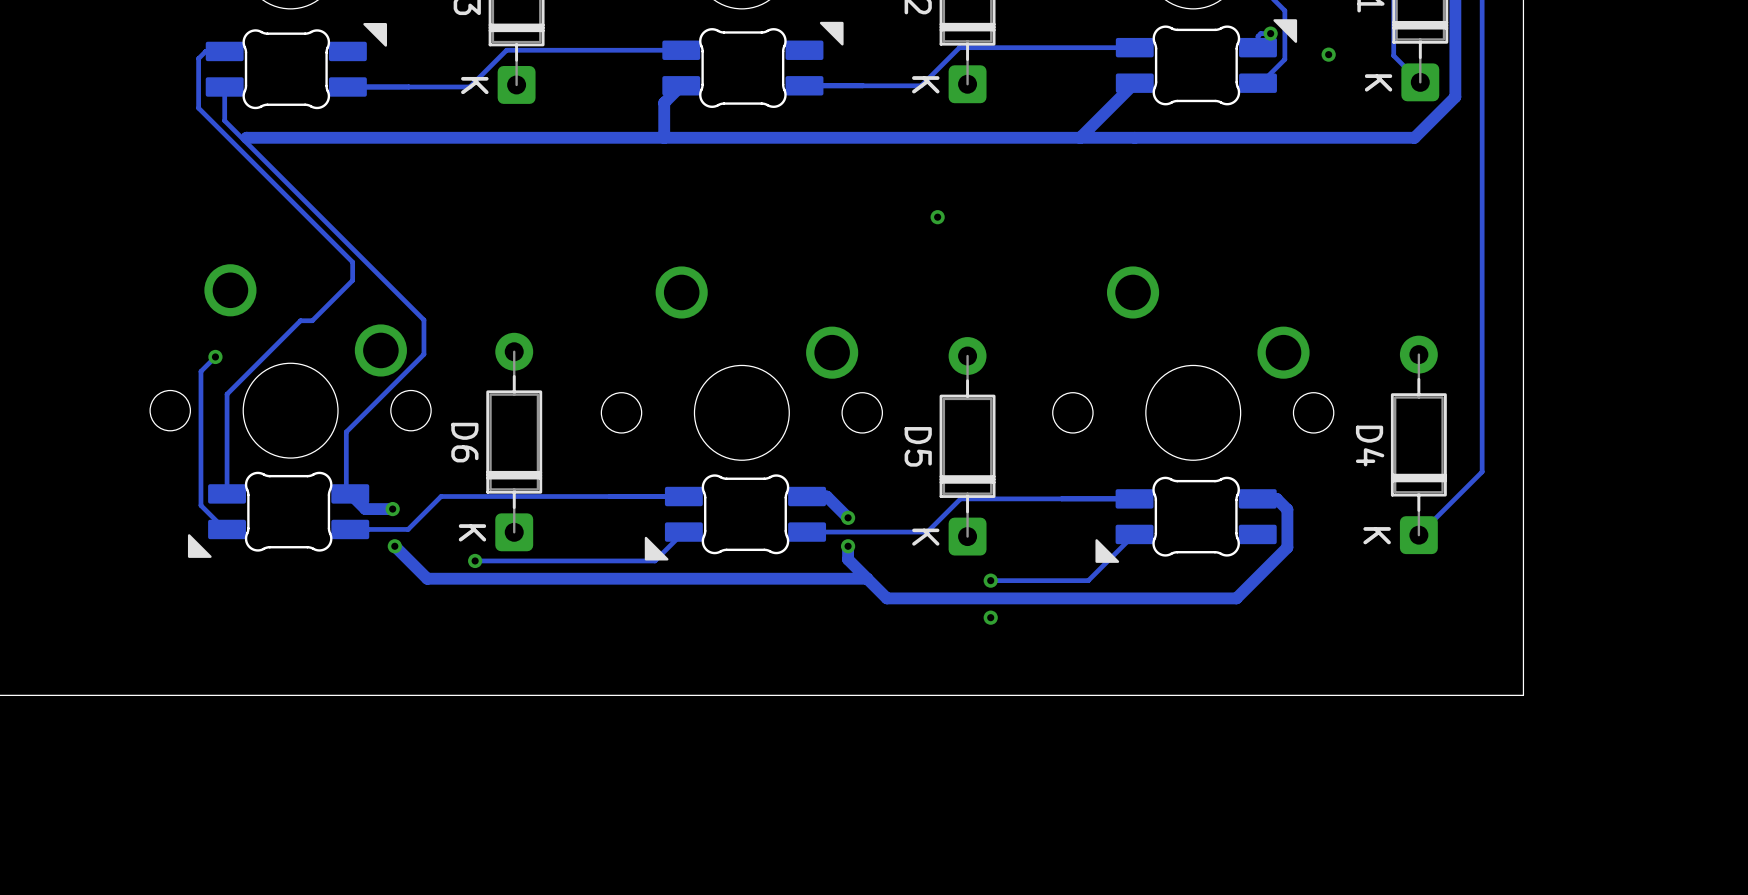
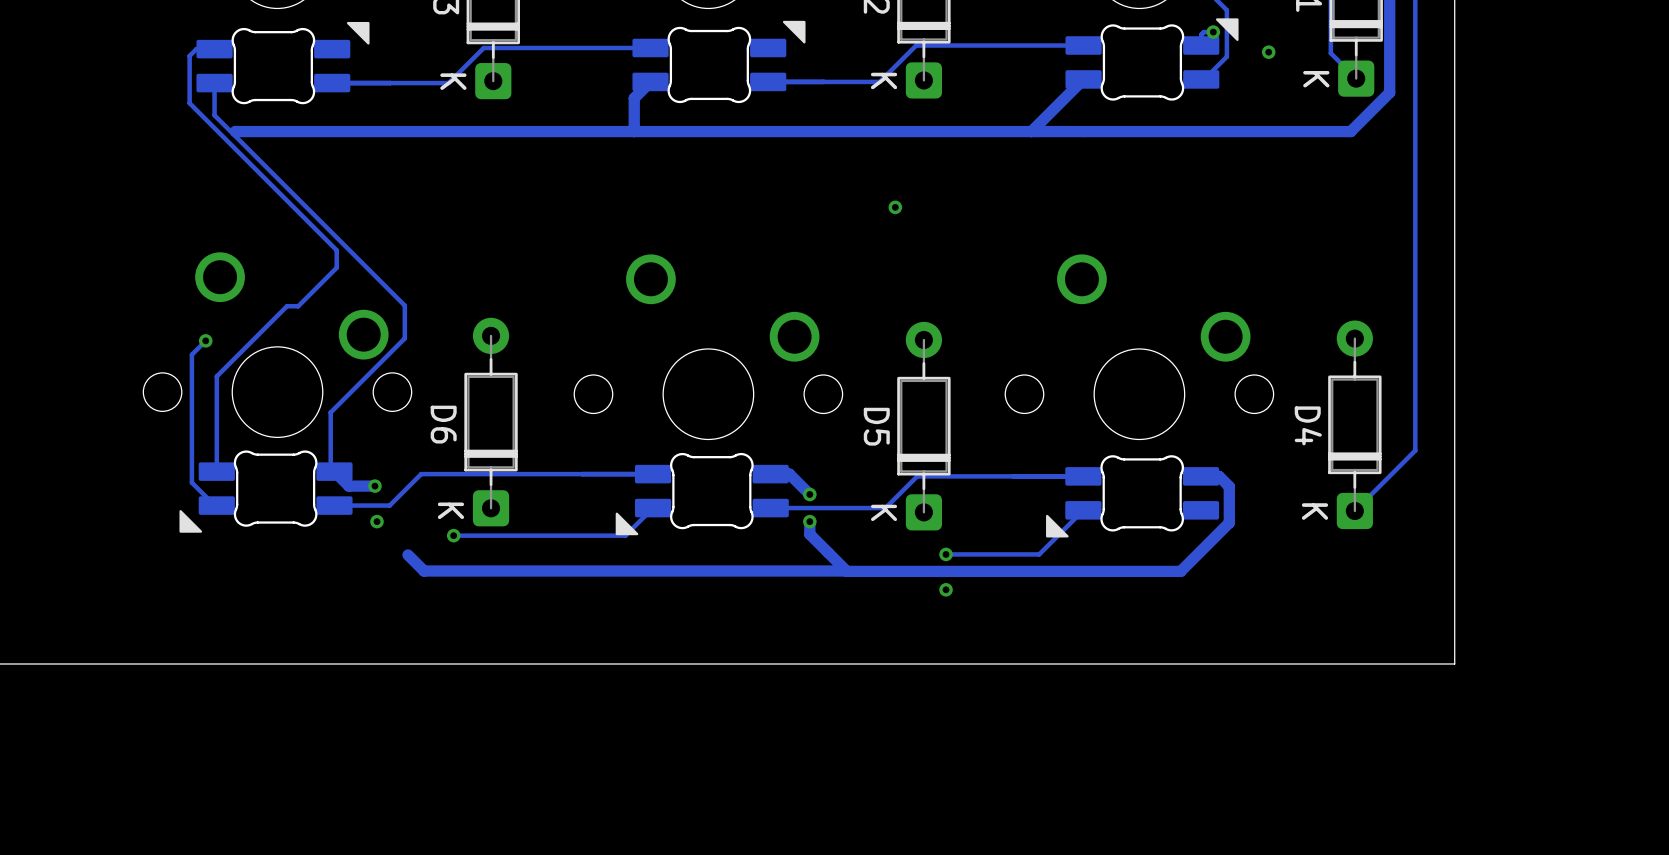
D6 footprint: [486, 332, 543, 552] -> [464, 317, 518, 527]
track: (394, 546) (427, 578) (867, 578) -> none
track: none -> (408, 554) (424, 571) (846, 571)

